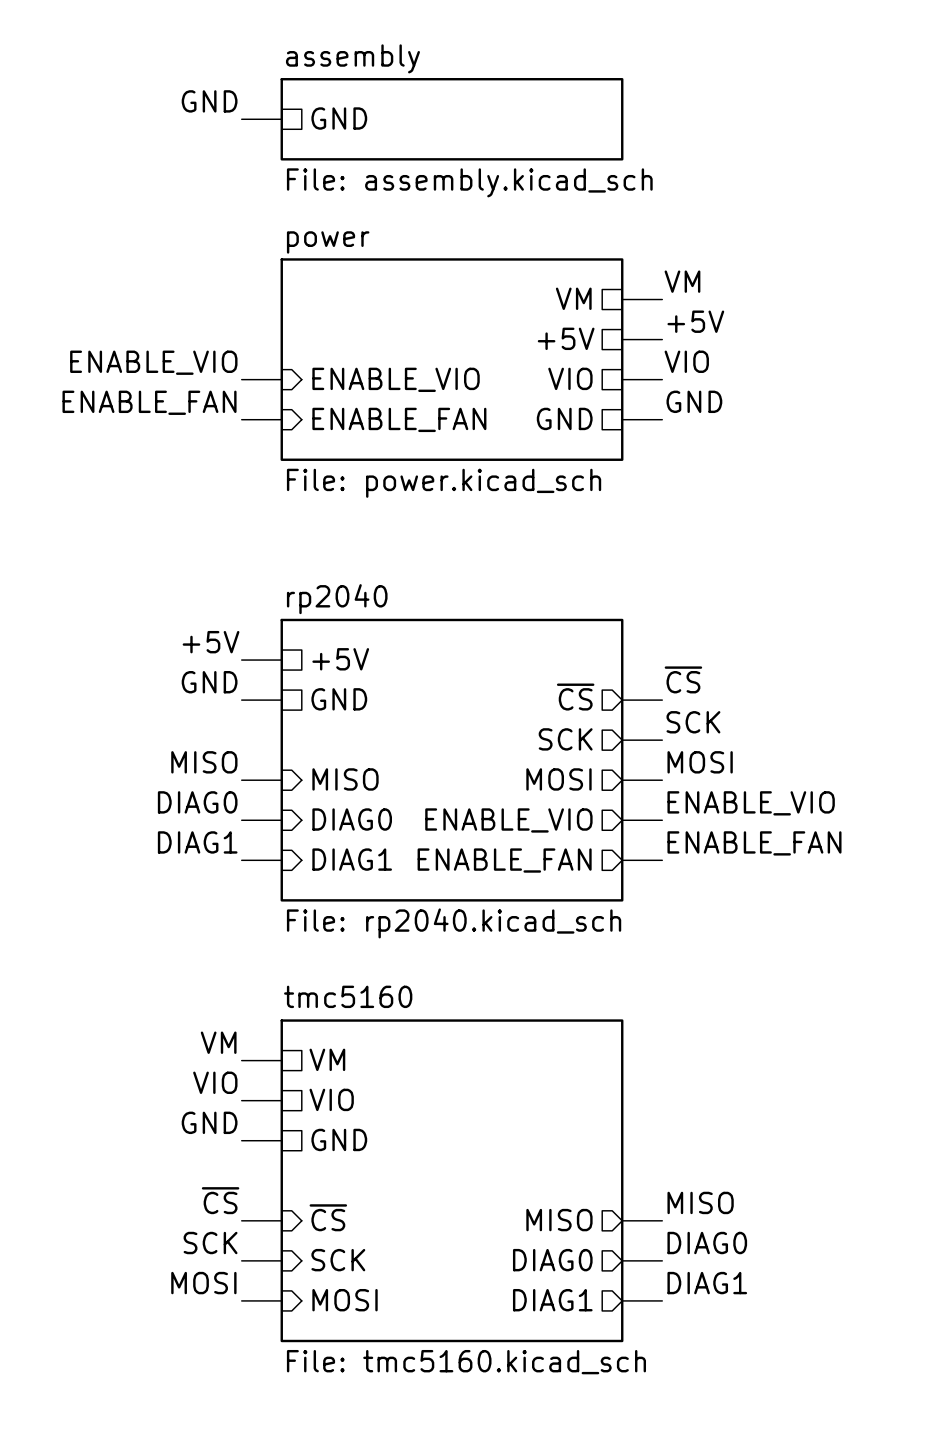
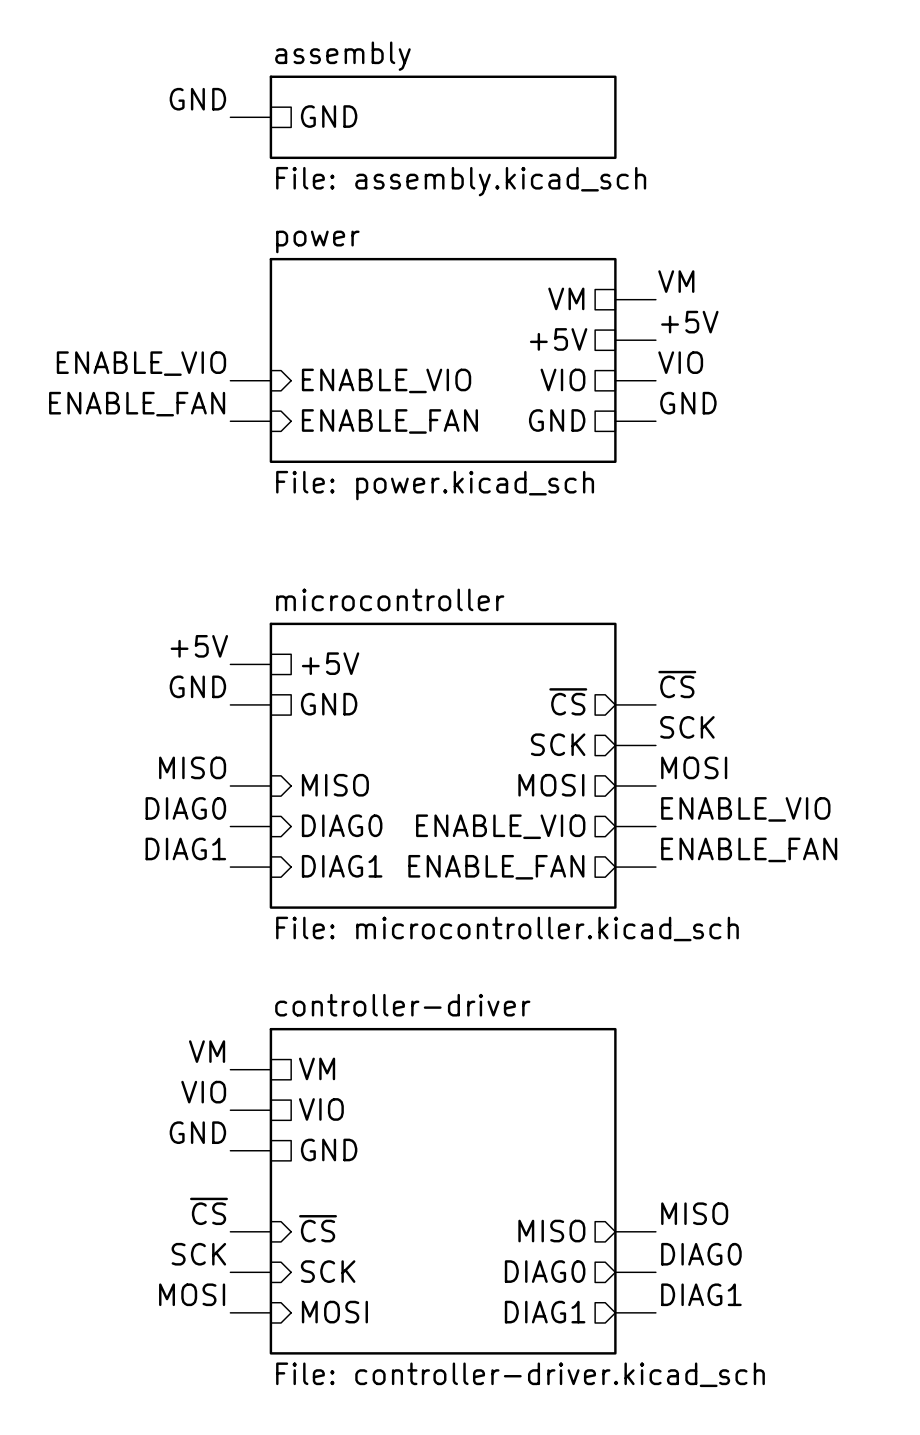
sheet rp2040 name: rp2040 (337, 599) -> microcontroller (390, 599)
sheet rp2040 value: File: rp2040.kicad_sch (454, 923) -> File: microcontroller.kicad_sch (507, 928)
sheet tmc5160 name: tmc5160 (348, 996) -> controller-driver (402, 1005)
sheet tmc5160 value: File: tmc5160.kicad_sch (466, 1362) -> File: controller-driver.kicad_sch (520, 1374)

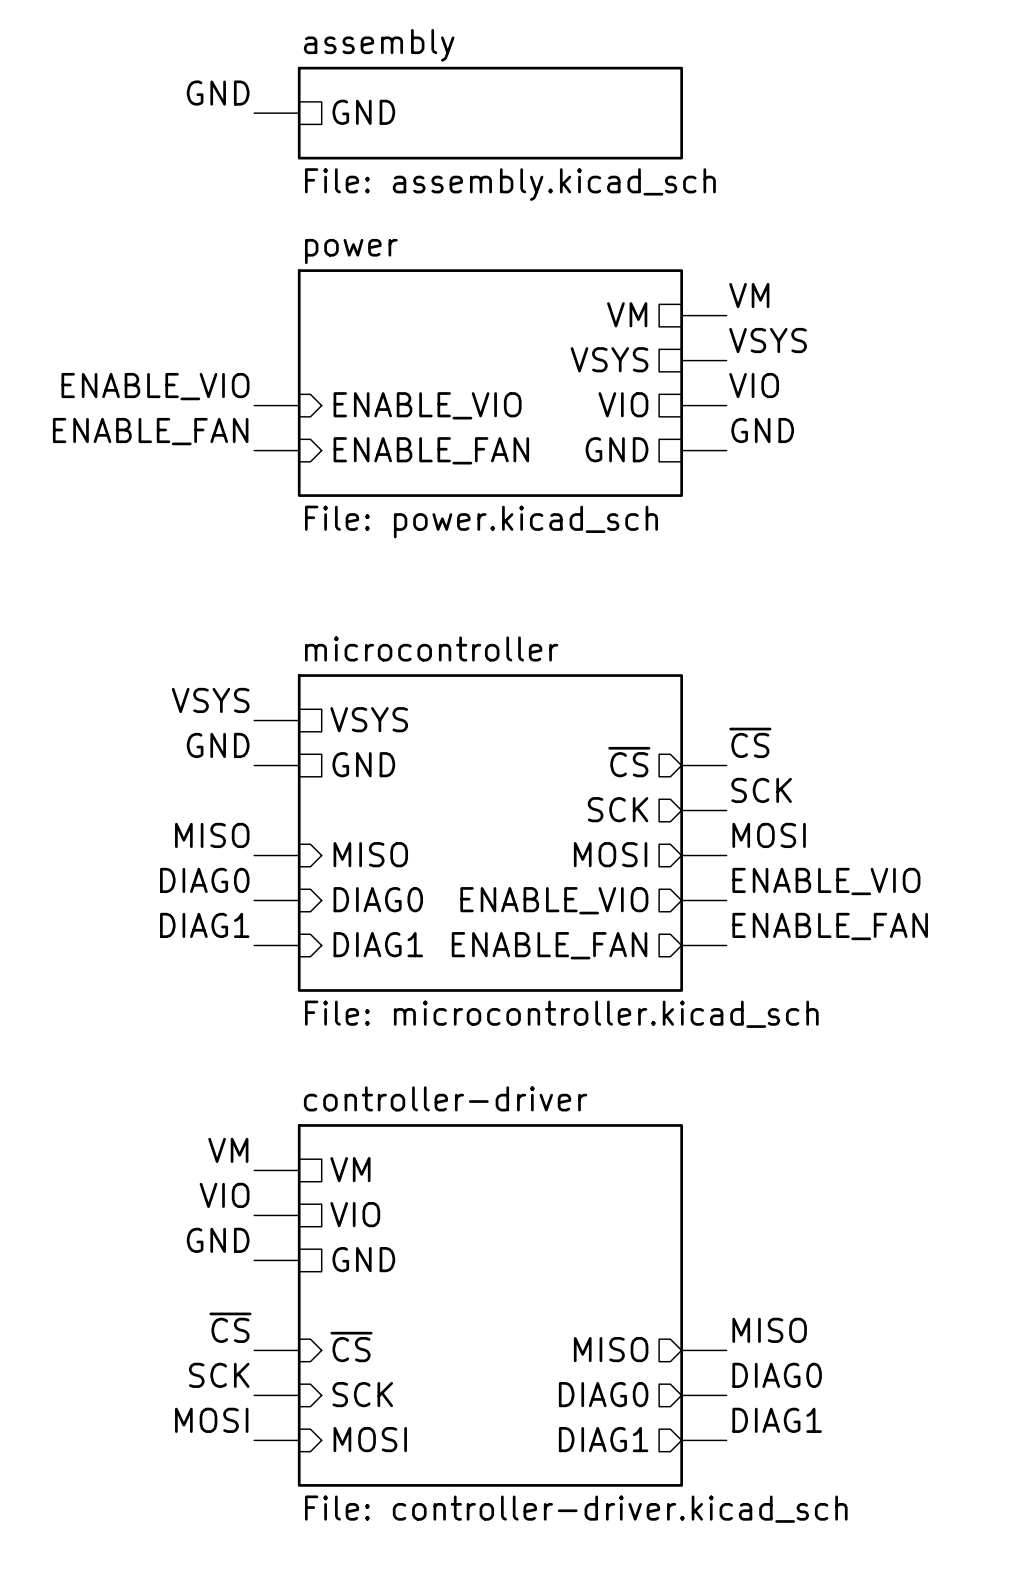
label: +5V (689, 322) -> VSYS (768, 340)
sheet pin: +5V (558, 339) -> VSYS (609, 359)
label: +5V (199, 646) -> VSYS (210, 700)
sheet pin: +5V (330, 663) -> VSYS (369, 719)

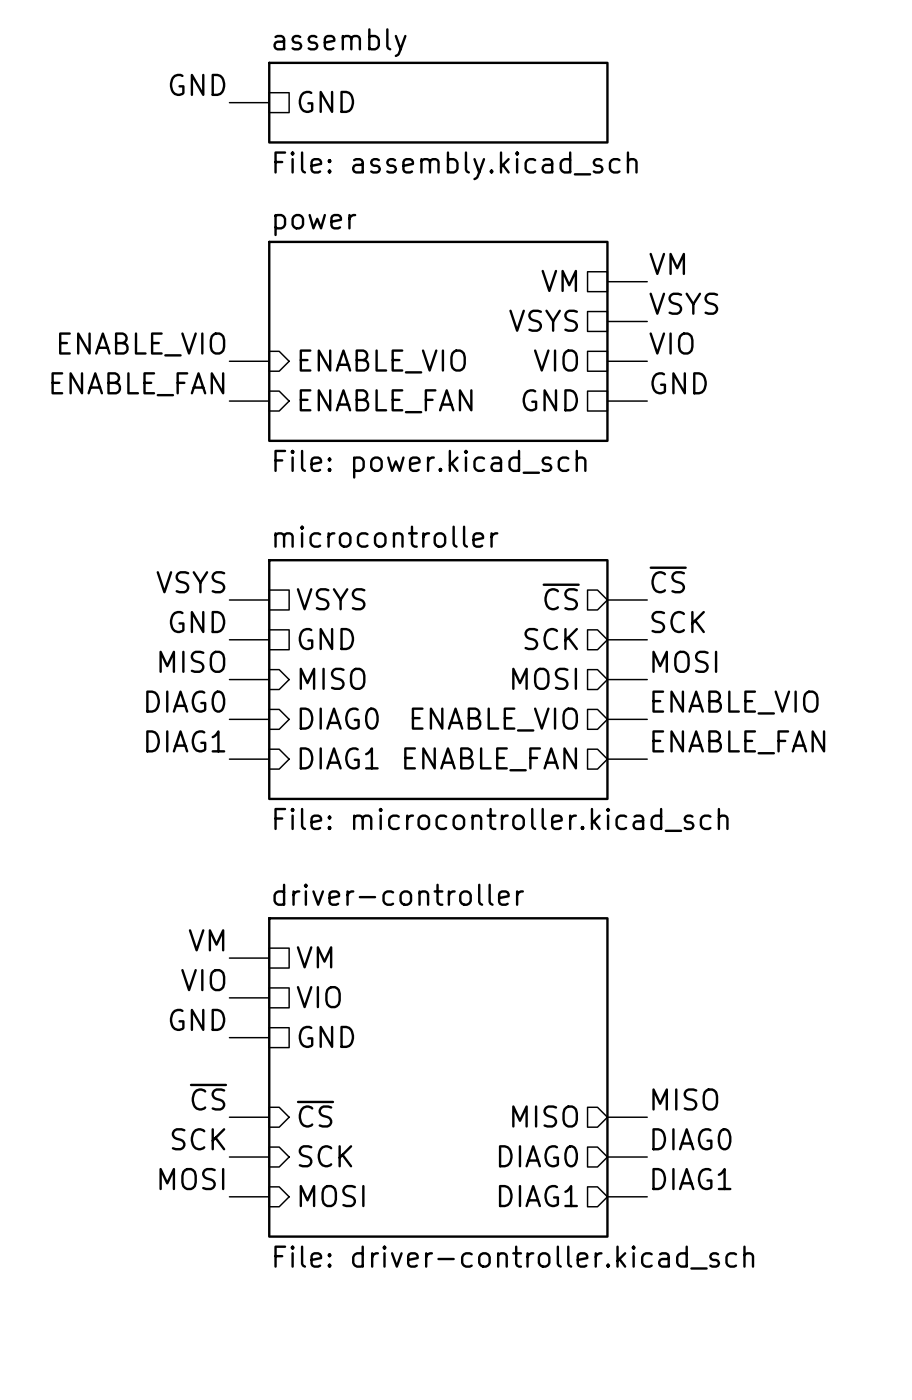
label: none -> ~{CS} (668, 579)
label: none -> VSYS (190, 582)
sheet pin: none -> ~{CS} (561, 596)
sheet pin: none -> VSYS (331, 599)
label: VSYS (210, 700) -> GND (197, 622)
label: none -> SCK (678, 622)
sheet pin: VSYS (369, 719) -> GND (326, 639)
sheet pin: none -> SCK (551, 639)
label: ~{CS} (750, 742) -> MOSI (684, 661)
label: GND (218, 745) -> MISO (192, 661)
sheet pin: ~{CS} (629, 762) -> MOSI (544, 678)
sheet pin shape: passive (363, 764) -> input (332, 678)
sheet pin: GND (363, 764) -> MISO (332, 678)
sheet microcontroller: none -> File: microcontroller.kicad_sch (438, 679)
label: SCK (761, 790) -> ENABLE_VIO (735, 702)
sheet pin: SCK (618, 809) -> ENABLE_VIO (494, 719)
sheet microcontroller: File: microcontroller.kicad_sch (490, 833) -> none
label: MISO (212, 835) -> DIAG1 (185, 741)
label: MOSI (769, 835) -> ENABLE_FAN (738, 742)
sheet pin: MISO (370, 854) -> DIAG1 (339, 758)
sheet pin: MOSI (610, 854) -> ENABLE_FAN (490, 759)
label position: DIAG0 (204, 880) -> DIAG0 (185, 701)
label: ENABLE_VIO (826, 881) -> none
sheet pin position: DIAG0 (378, 899) -> DIAG0 (339, 718)
wire: (254, 900) (299, 900) -> (229, 599) (269, 599)
sheet pin: ENABLE_VIO (554, 900) -> none
wire: (681, 900) (726, 900) -> (607, 599) (647, 599)
label: DIAG1 (204, 925) -> none
label: ENABLE_FAN (830, 926) -> none
sheet pin: DIAG1 (378, 944) -> none
wire: (254, 945) (299, 945) -> (229, 719) (269, 719)
sheet pin: ENABLE_FAN (549, 945) -> none
wire: (681, 945) (726, 945) -> (607, 639) (647, 639)
label: none -> VM (206, 940)
sheet pin: none -> VM (314, 957)
label: VM (228, 1150) -> GND (197, 1019)
sheet pin: VM (350, 1169) -> GND (326, 1036)
label position: VIO (224, 1195) -> VIO (203, 980)
sheet pin position: VIO (355, 1214) -> VIO (318, 997)
wire: (254, 1215) (299, 1215) -> (229, 958) (269, 958)
sheet driver-controller: none -> File: driver-controller.kicad_sch (438, 1077)
label: GND (218, 1240) -> ~{CS} (208, 1097)
label: none -> MISO (685, 1099)
sheet pin shape: passive (363, 1259) -> input (315, 1114)
sheet pin: GND (363, 1259) -> ~{CS} (315, 1114)
sheet pin: none -> MISO (545, 1116)
sheet controller-driver: File: controller-driver.kicad_sch (490, 1305) -> none
label: ~{CS} (230, 1327) -> MOSI (191, 1179)
label: MISO (769, 1330) -> DIAG1 (691, 1179)
sheet pin: ~{CS} (351, 1347) -> MOSI (332, 1196)
sheet pin: MISO (611, 1349) -> DIAG1 (538, 1196)
label position: SCK (219, 1375) -> SCK (198, 1139)
label position: DIAG0 (777, 1375) -> DIAG0 (691, 1139)
sheet pin position: SCK (362, 1394) -> SCK (325, 1156)
sheet pin position: DIAG0 (603, 1394) -> DIAG0 (538, 1156)
wire: (254, 1395) (299, 1395) -> (229, 997) (269, 997)
wire: (681, 1395) (726, 1395) -> (607, 1117) (647, 1117)
label: MOSI (211, 1420) -> none
label: DIAG1 (777, 1420) -> none
sheet pin: MOSI (370, 1439) -> none
sheet pin: DIAG1 (603, 1439) -> none
wire: (254, 1440) (299, 1440) -> (229, 1157) (269, 1157)
wire: (681, 1440) (726, 1440) -> (607, 1157) (647, 1157)

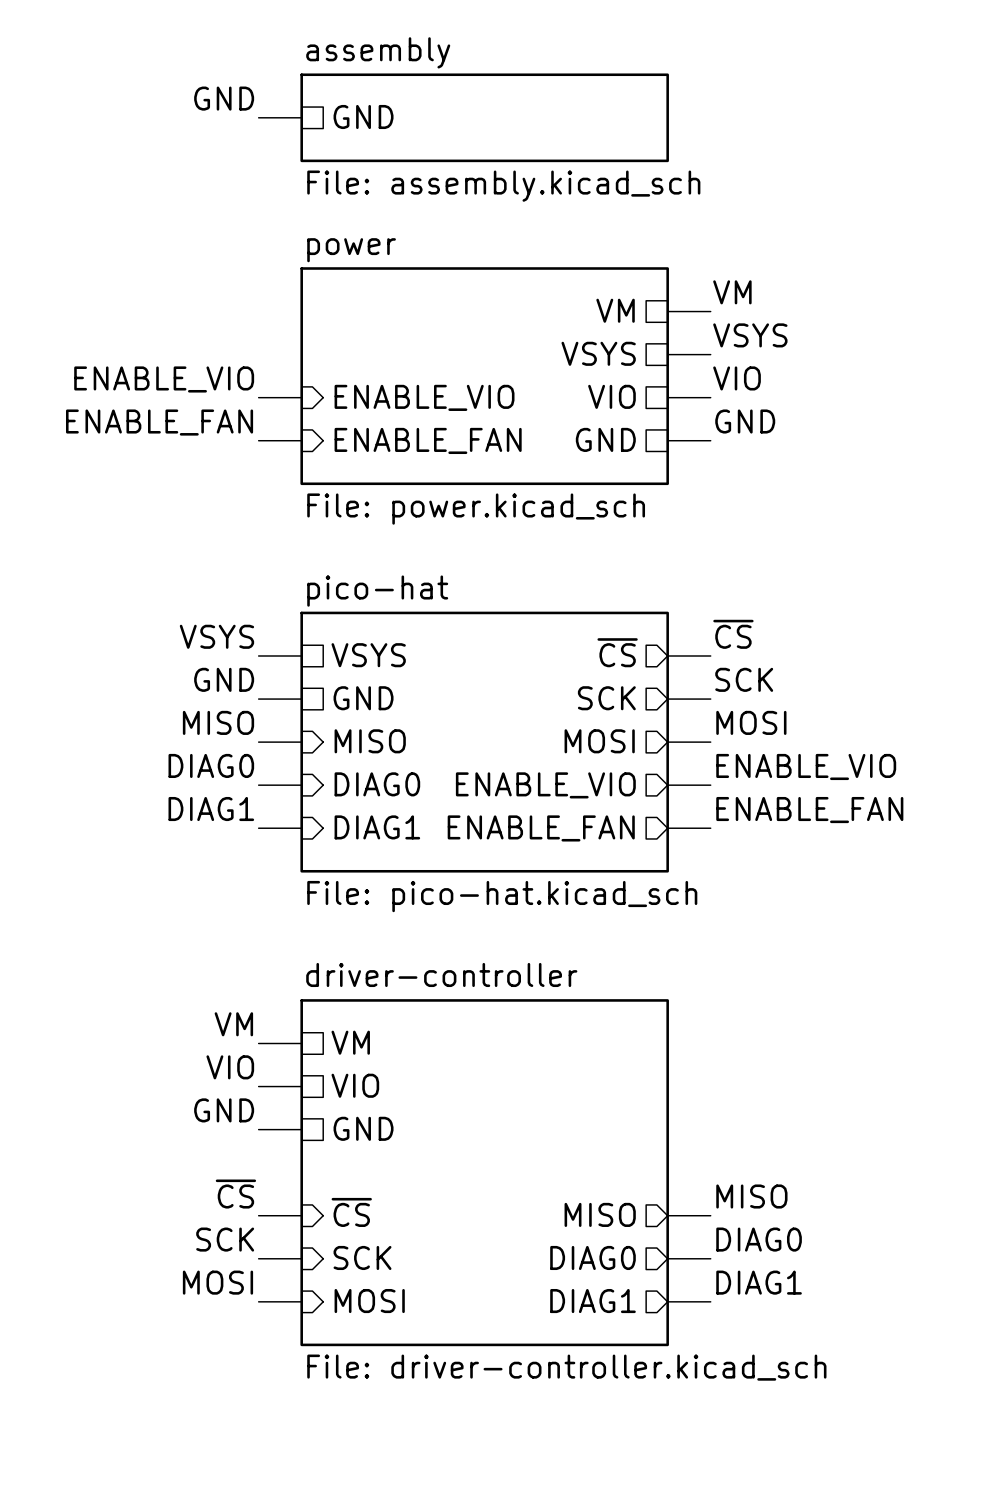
sheet microcontroller name: microcontroller (386, 536) -> pico-hat (377, 591)
sheet microcontroller value: File: microcontroller.kicad_sch (501, 819) -> File: pico-hat.kicad_sch (502, 896)

